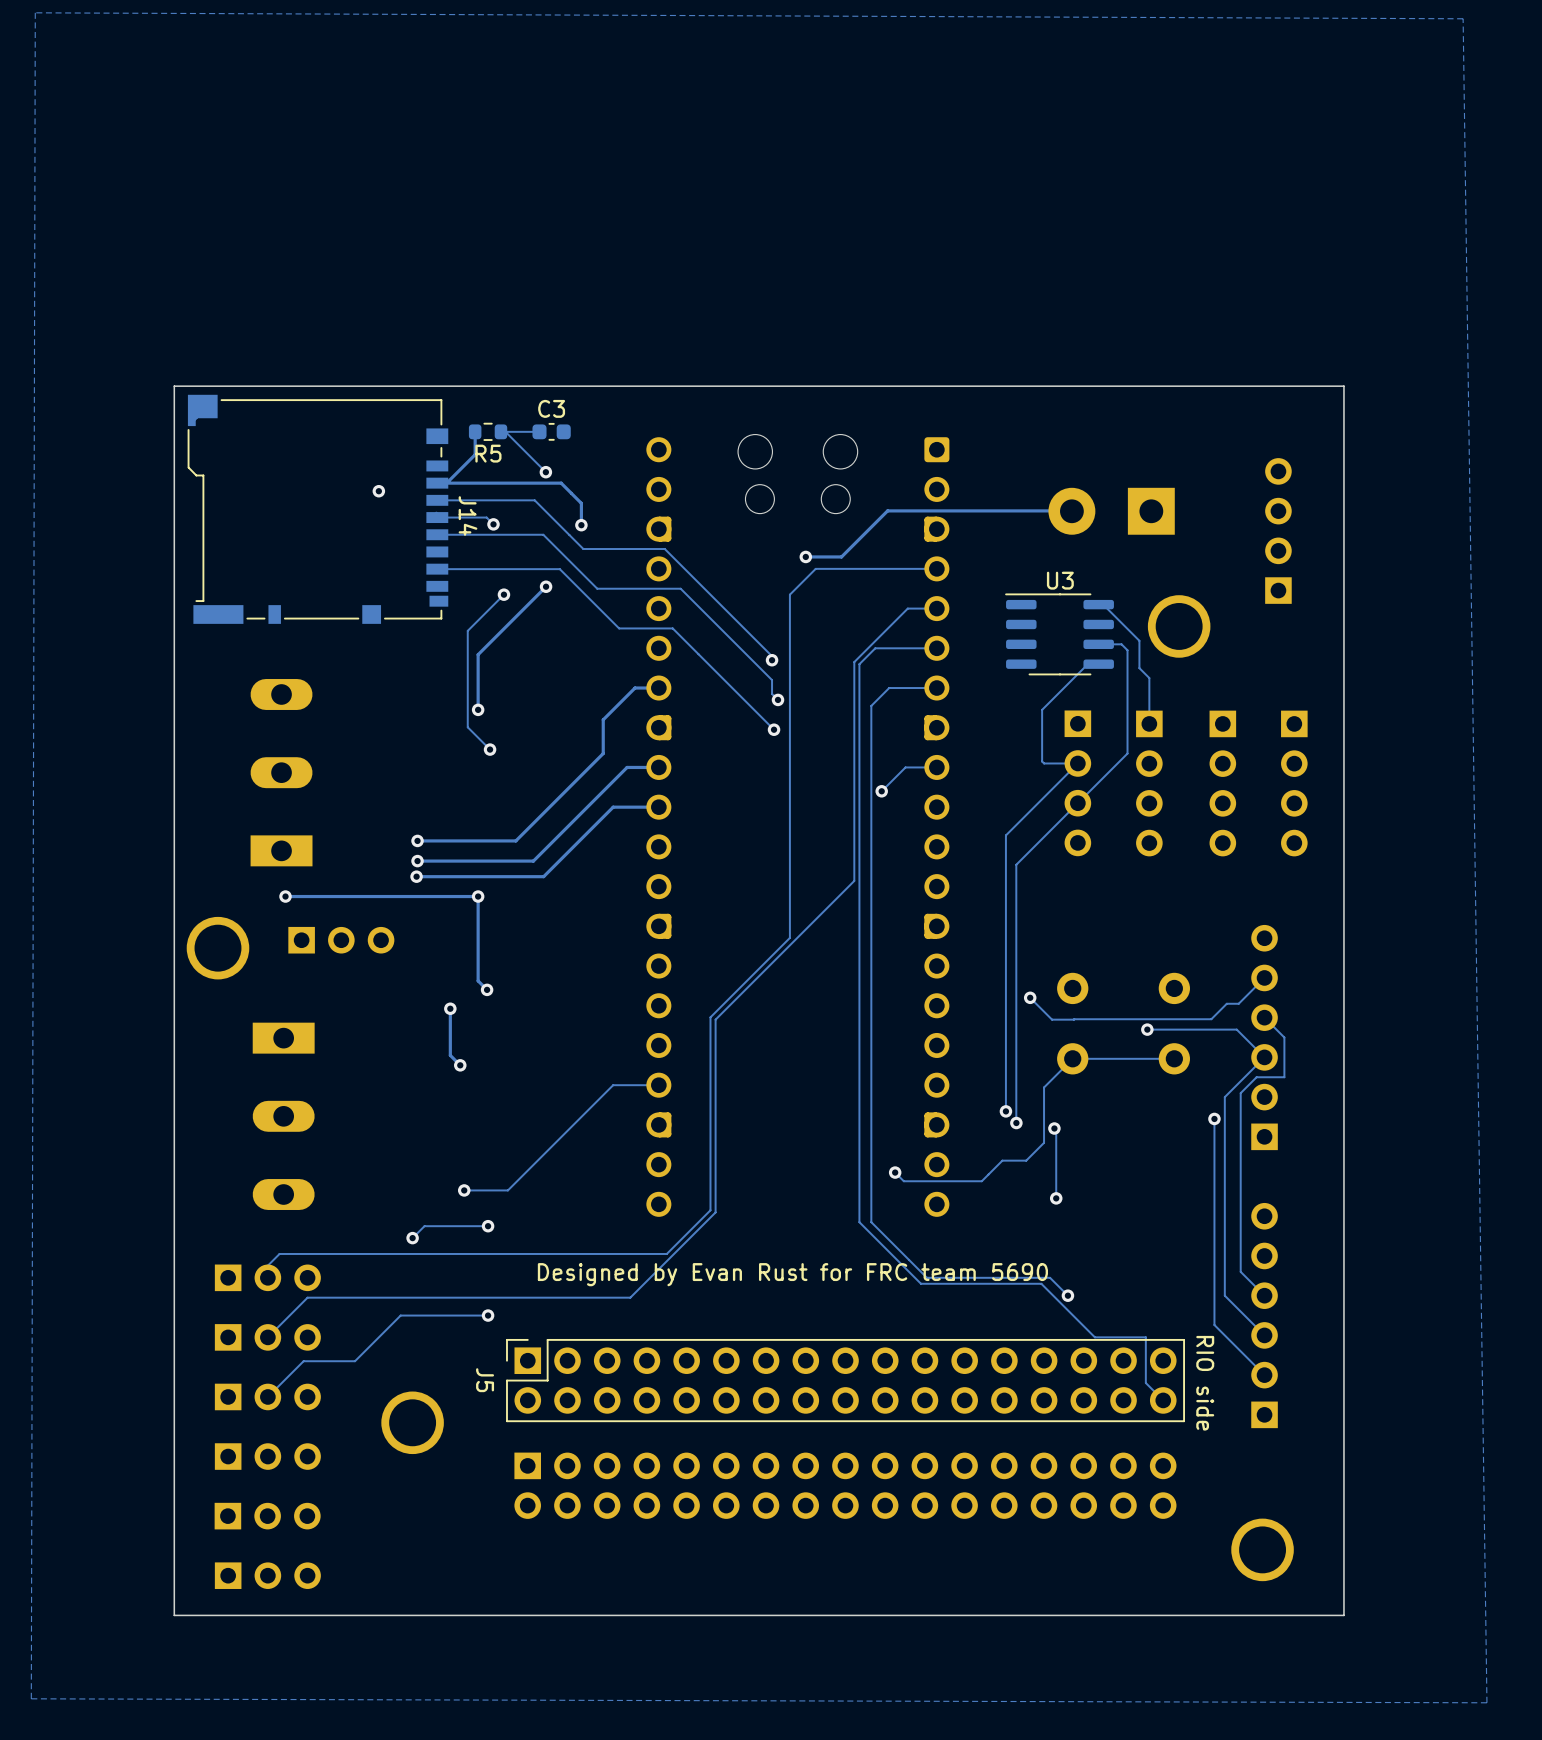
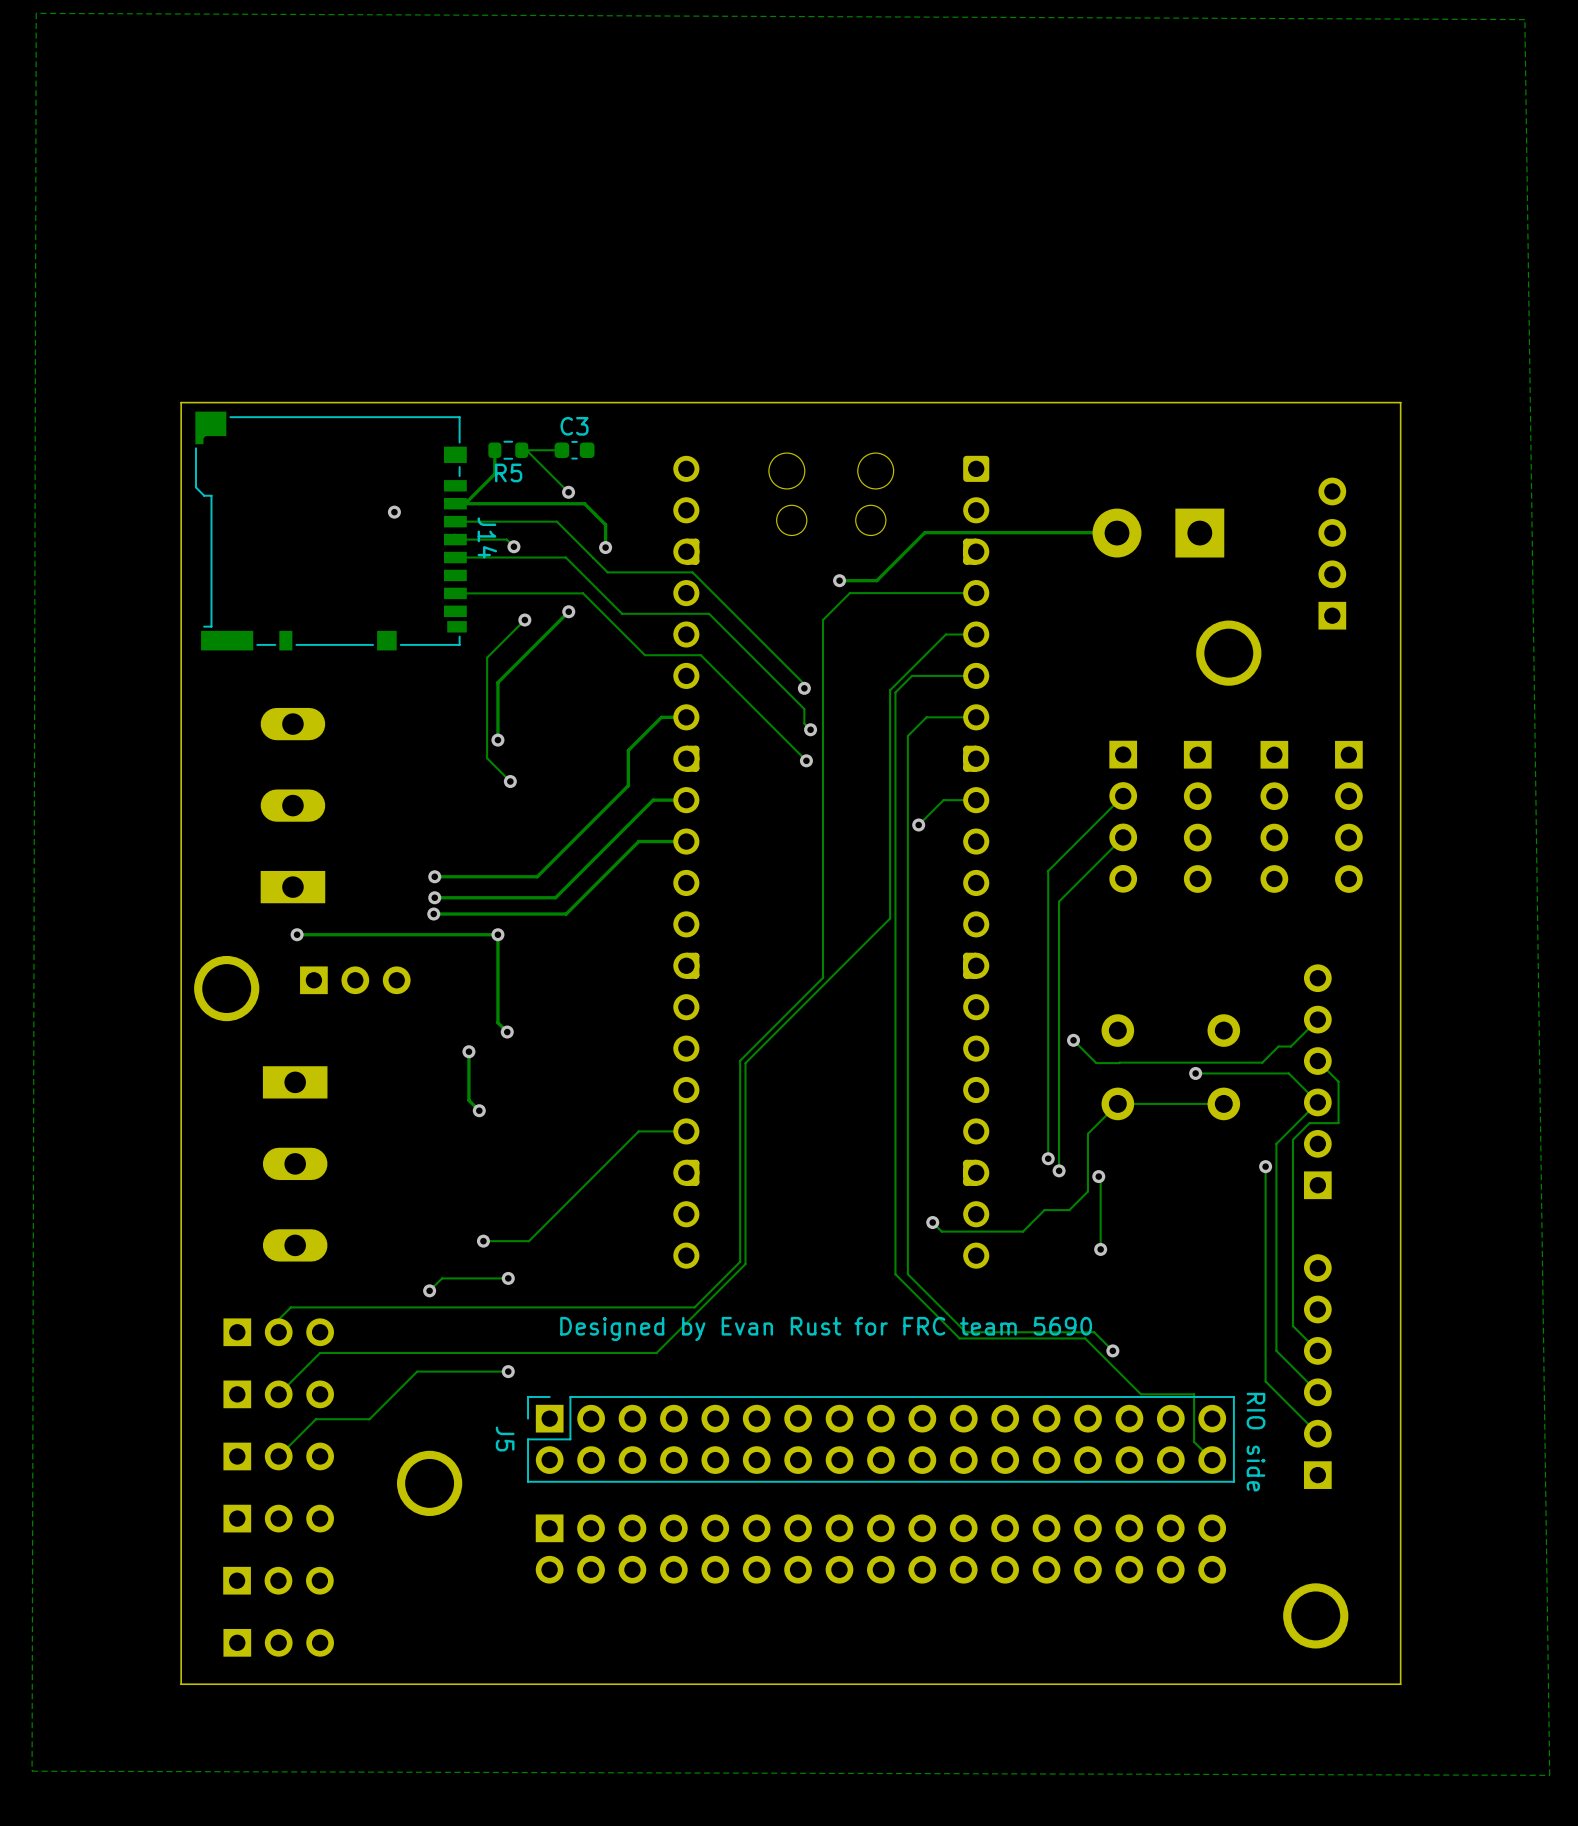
track: (1098, 604) (1103, 604) (1139, 640) (1139, 668) (1149, 678) (1149, 723) -> none
U3: (1059, 634) -> none
track: (1098, 644) (1121, 644) (1127, 650) (1127, 753) (1077, 803) -> none
track: (1098, 664) (1087, 664) (1042, 709) (1042, 761) (1044, 763) (1077, 763) -> none

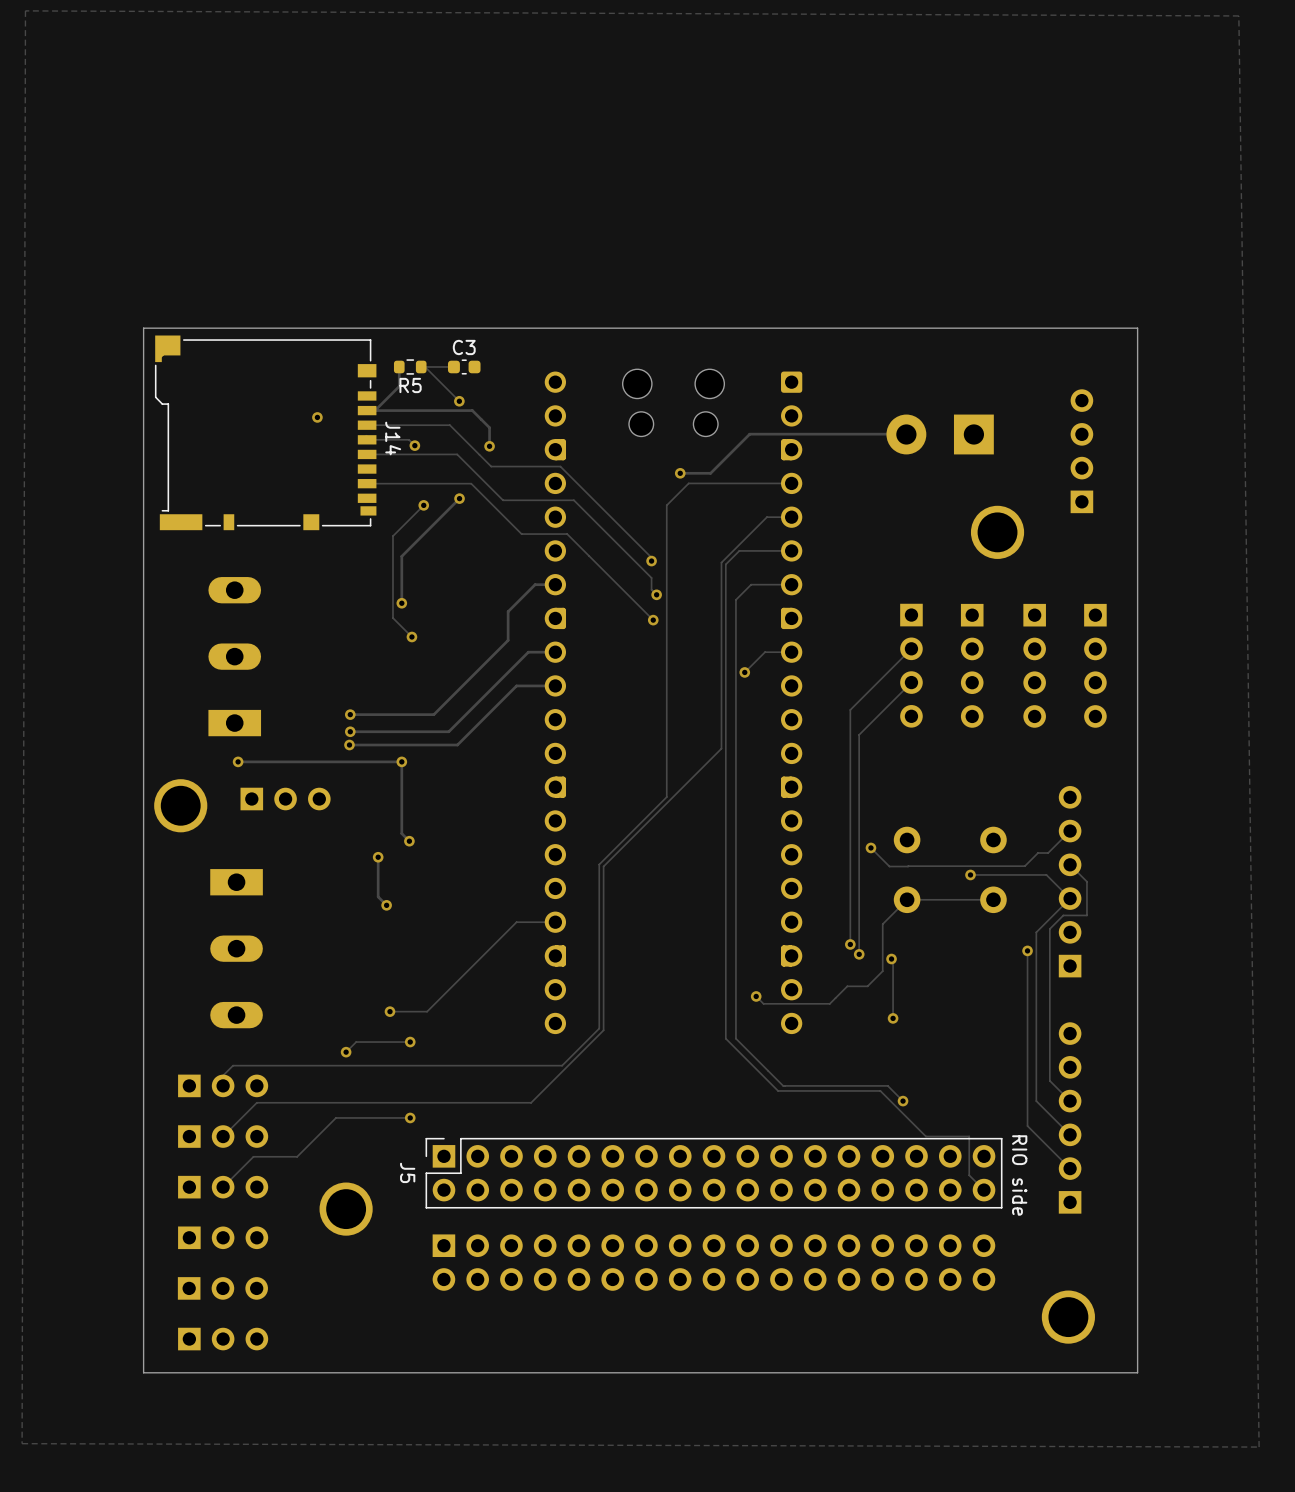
text: Designed by Evan Rust for FRC team 5690 (826, 1328) -> none

